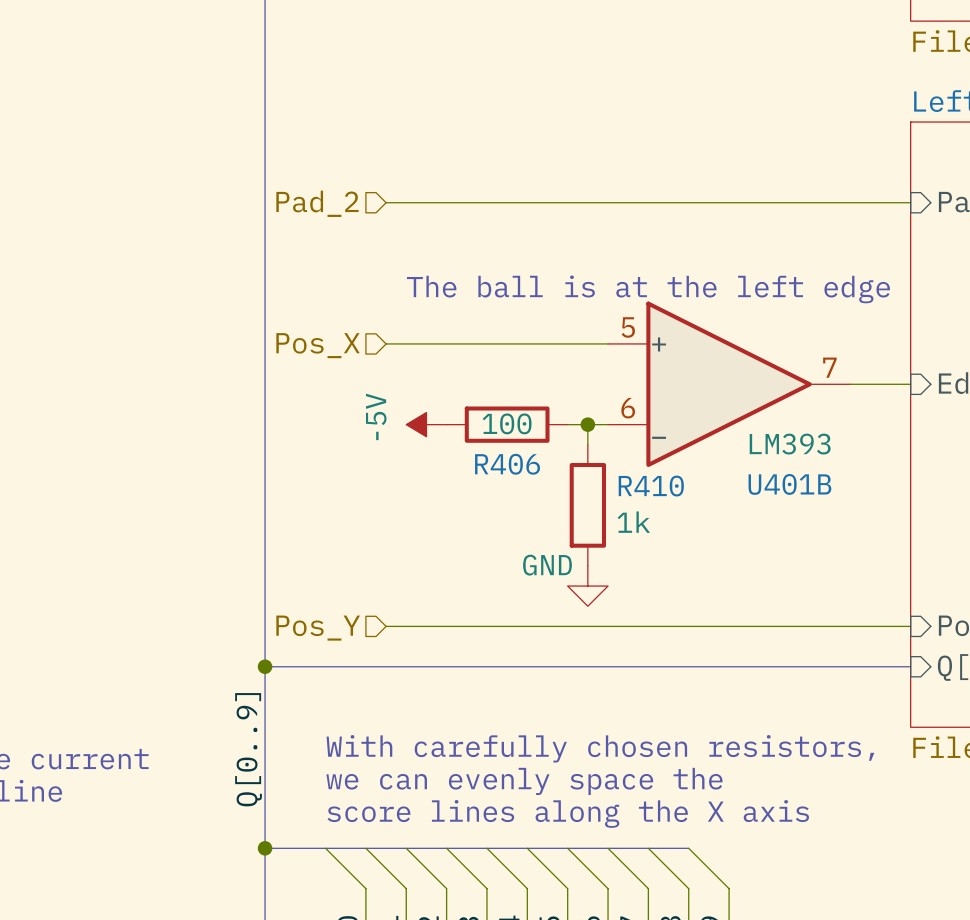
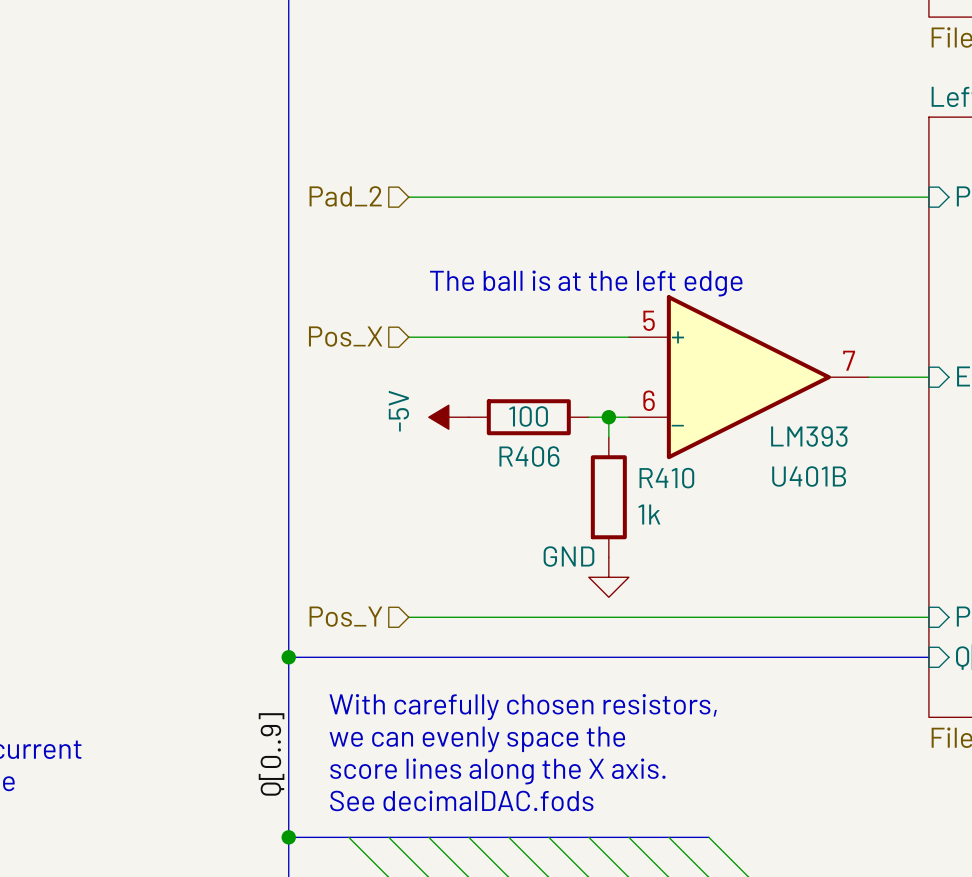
text position: With carefully chosen resistors, (600, 748) -> With carefully chosen resistors, (523, 707)
text position: we can evenly space the (524, 781) -> we can evenly space the (477, 739)
text: none -> See decimalDAC.fods (461, 800)
text: score lines along the X axis (568, 813) -> score lines along the X axis. (497, 771)

